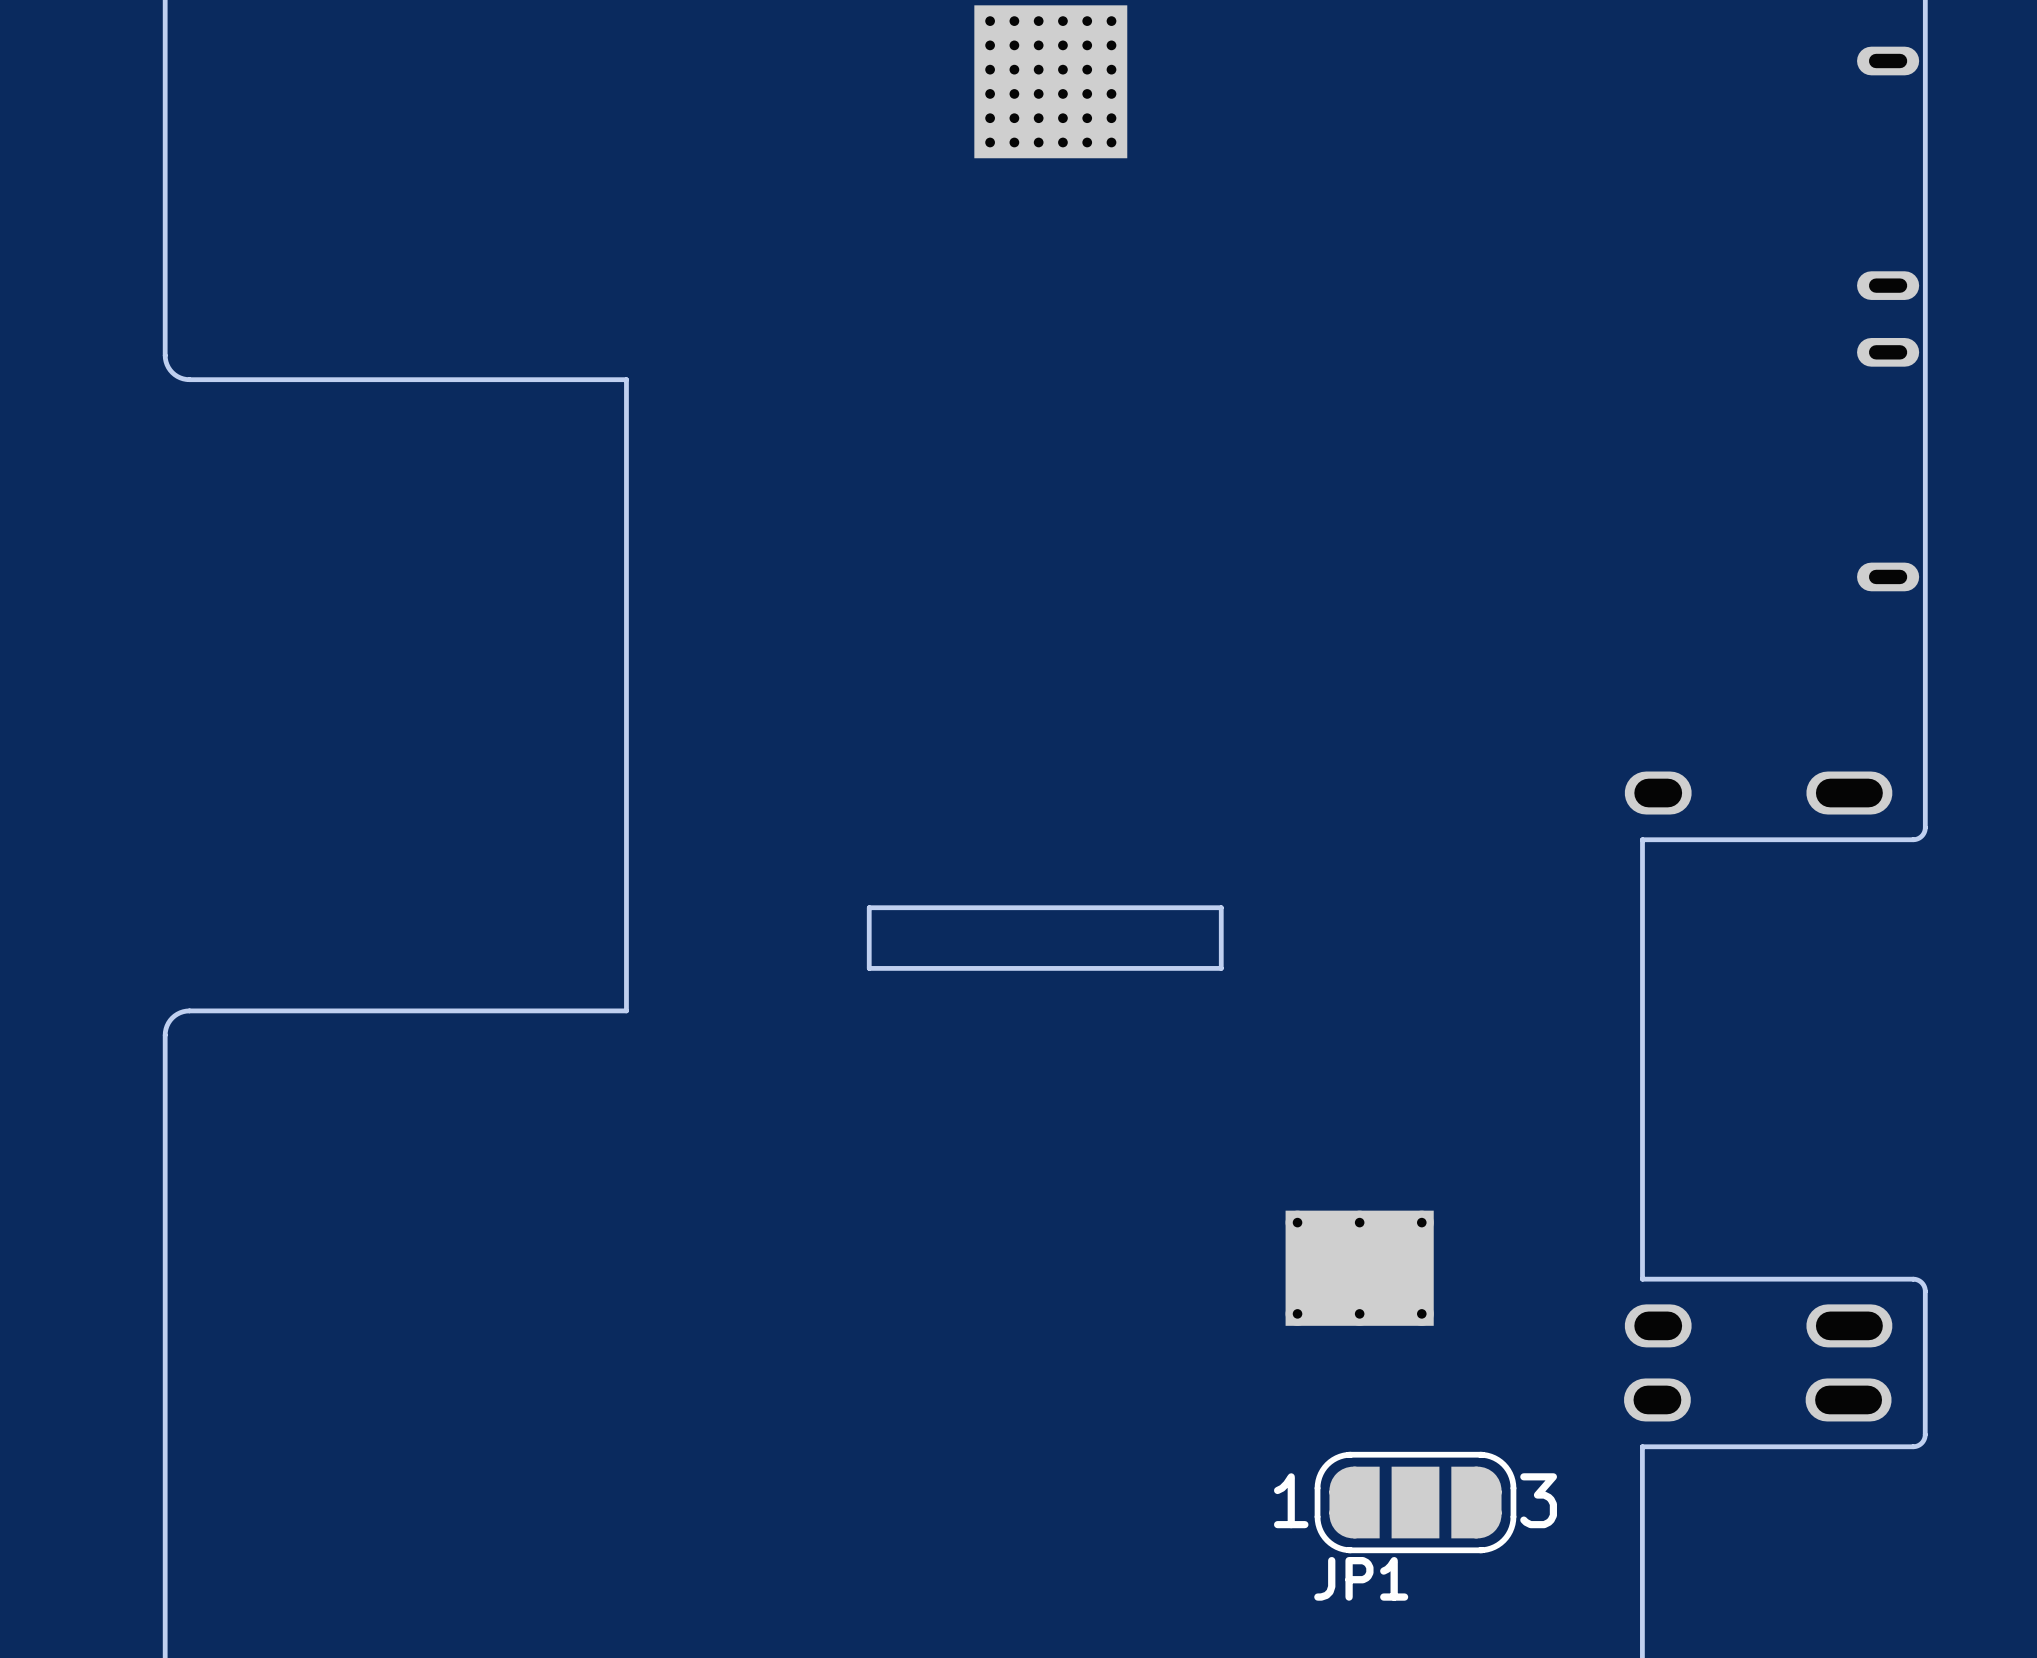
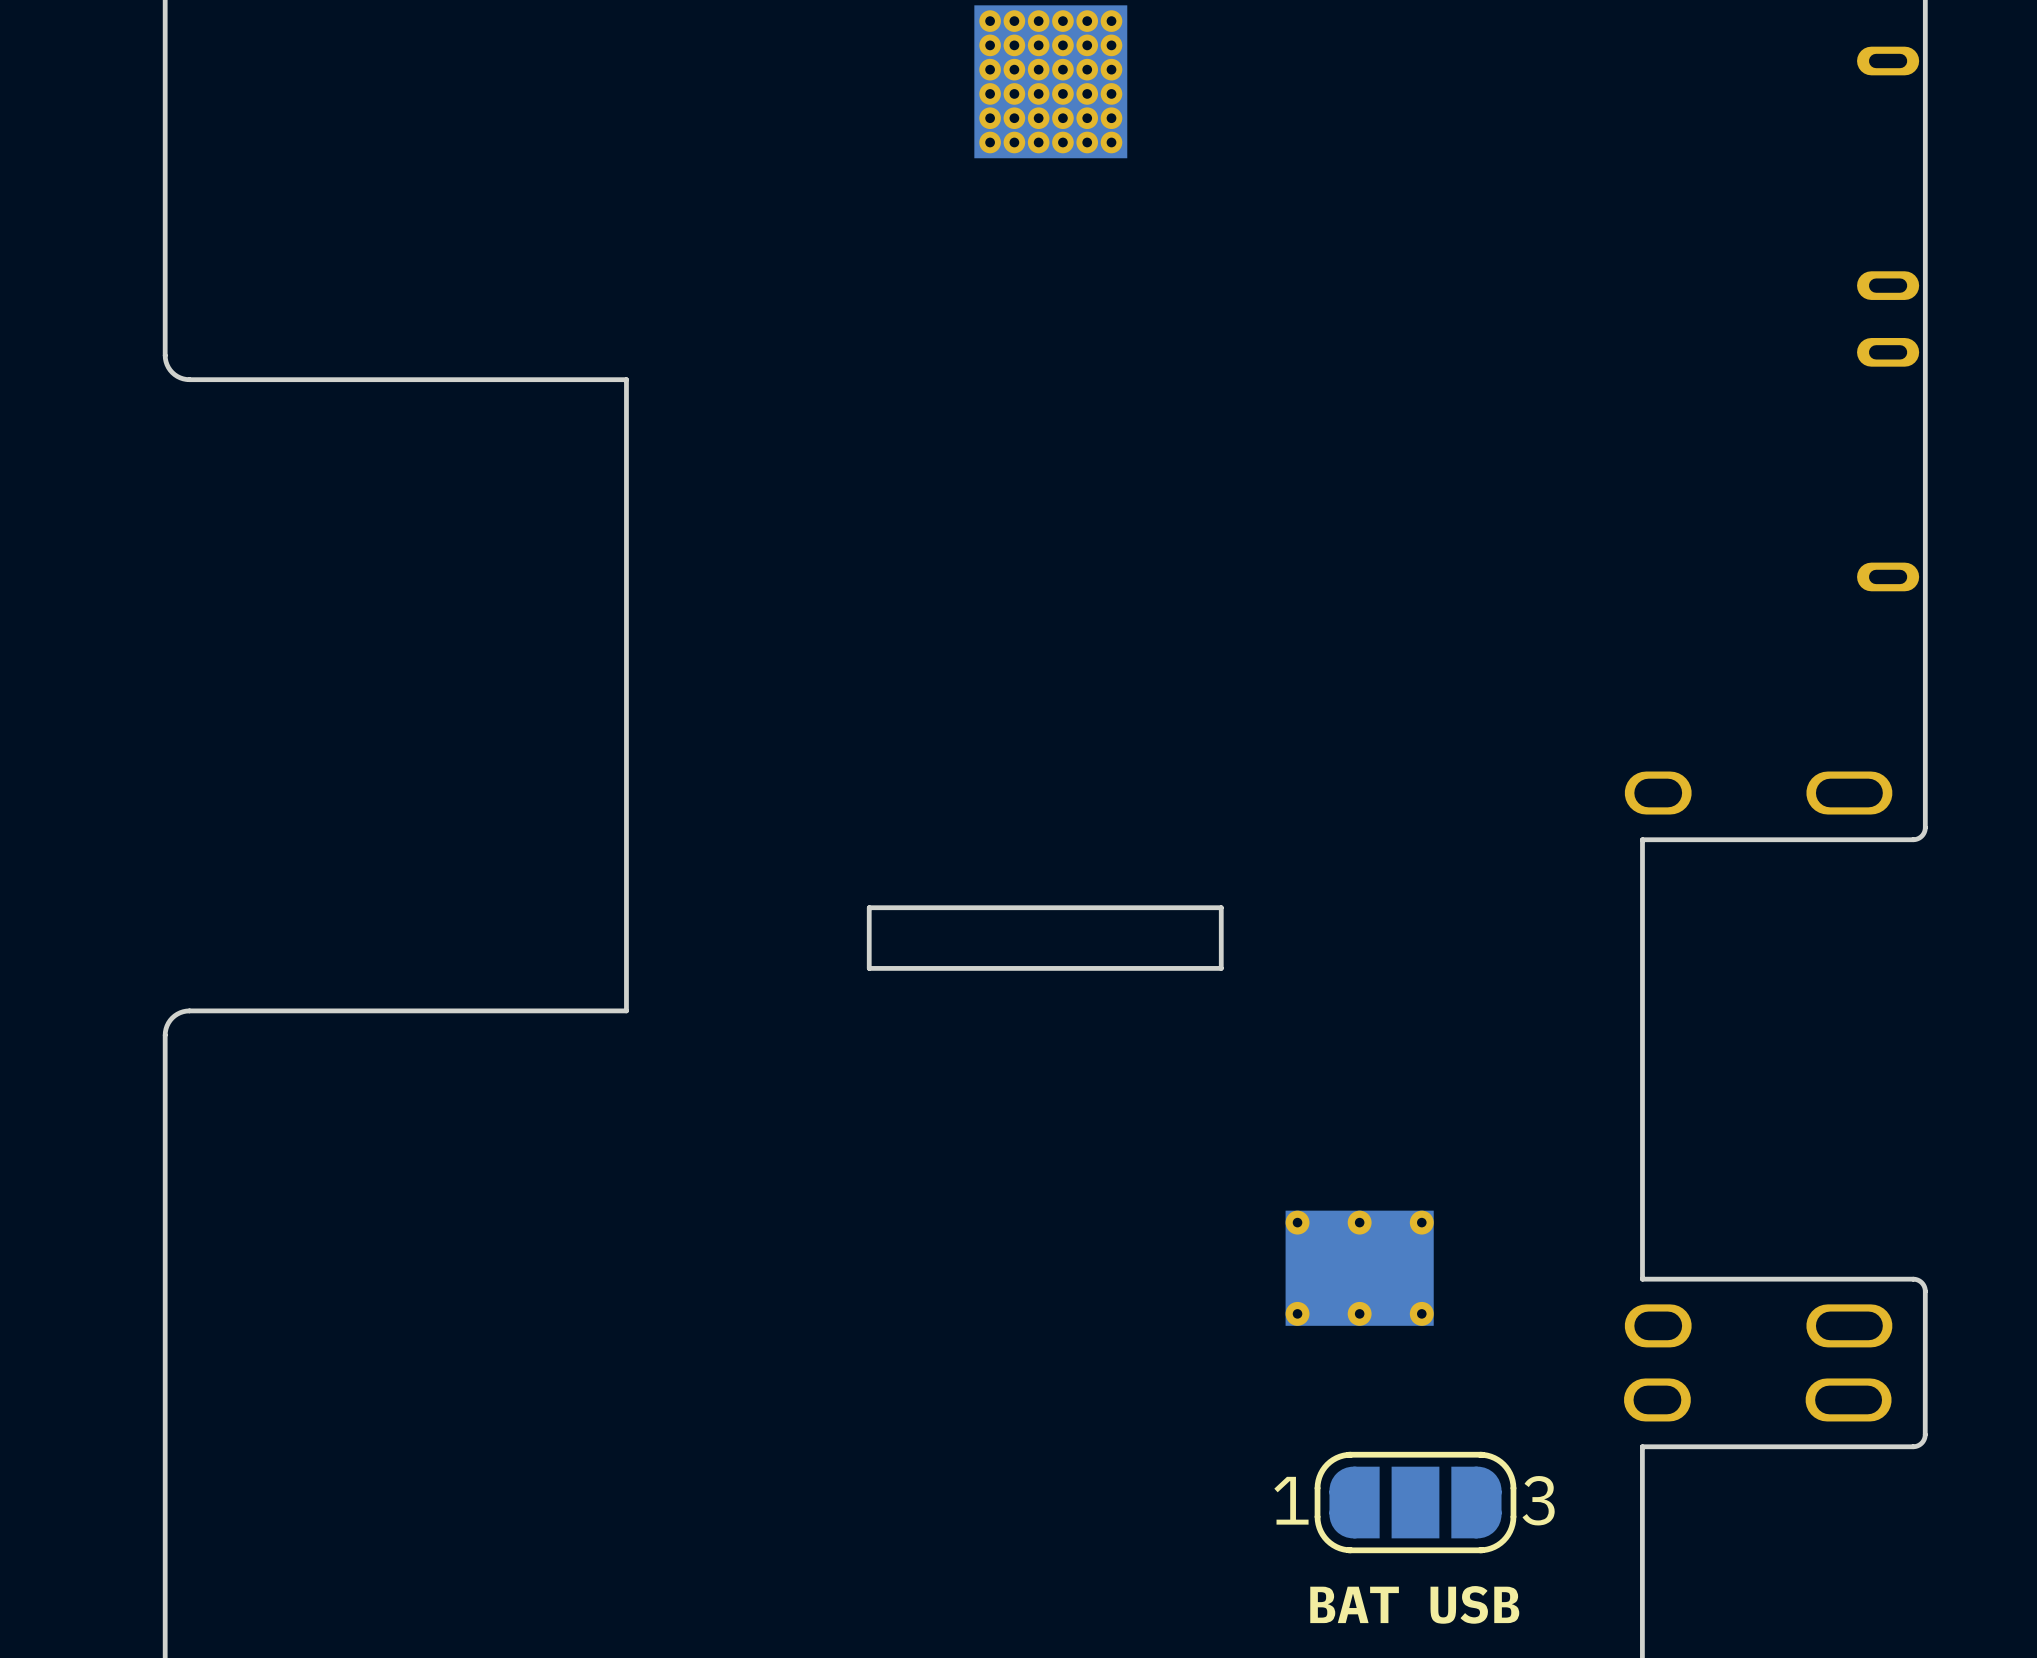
JP1 name: JP1 (1361, 1578) -> none
text: none -> BAT (1354, 1604)
text: none -> USB (1474, 1604)

